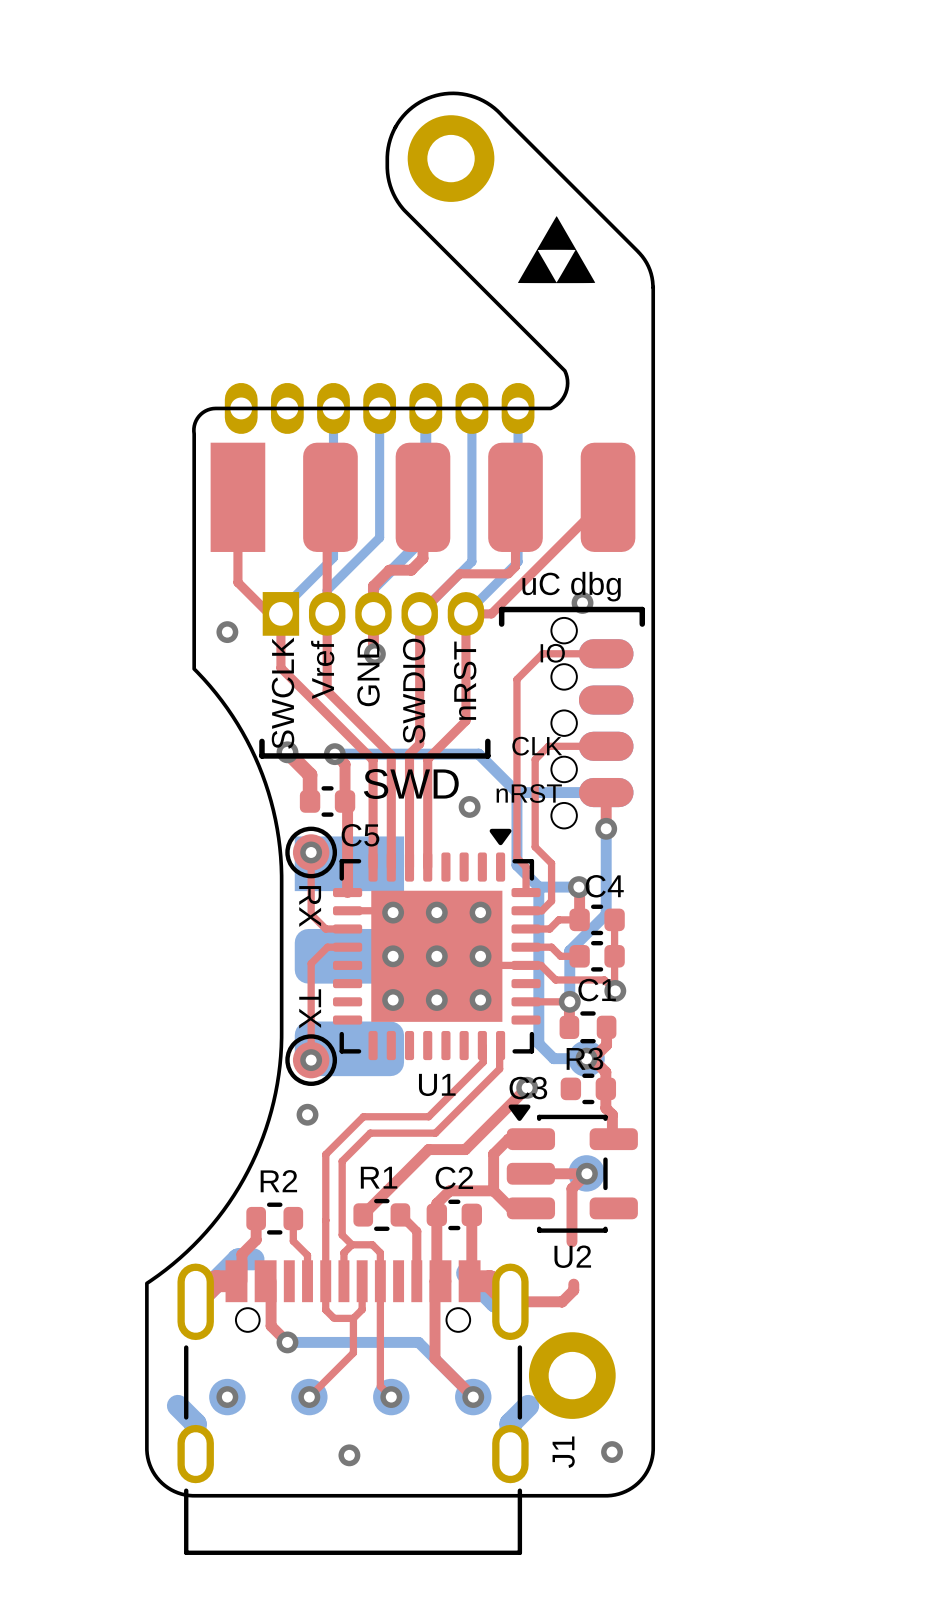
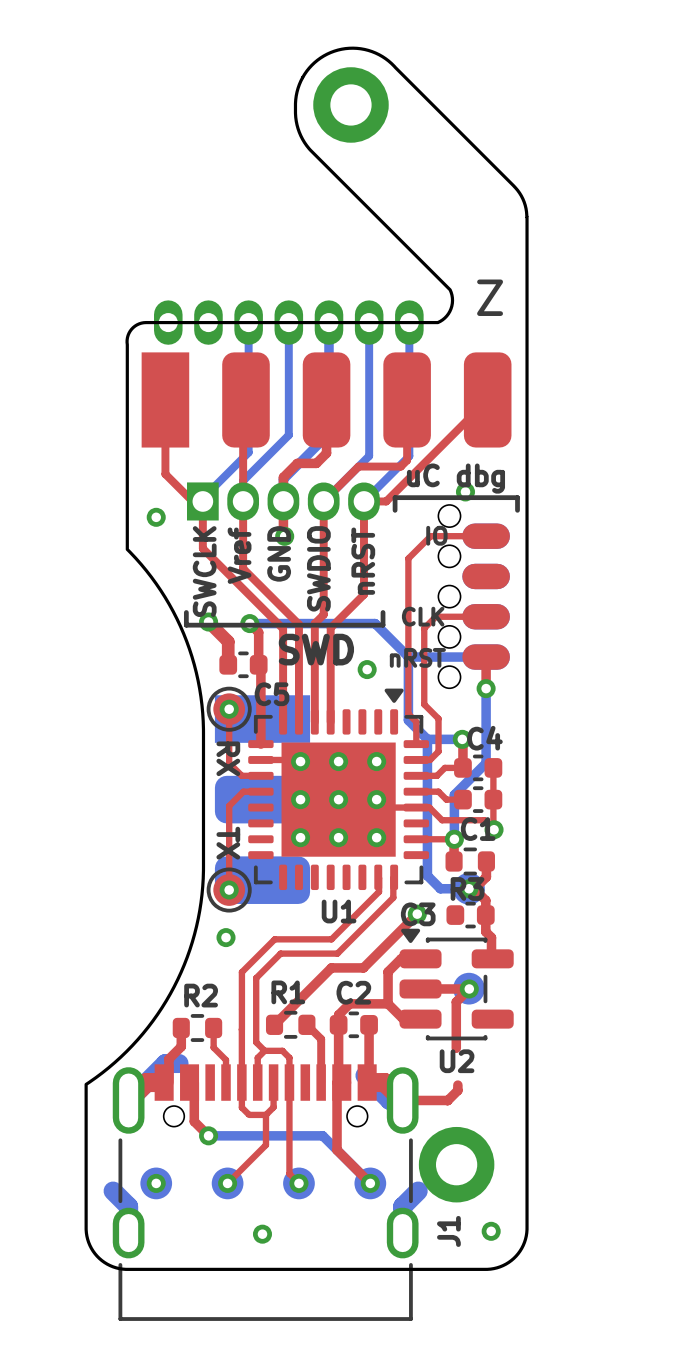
drawing: [517, 216, 596, 284] -> none
text: none -> Z (490, 297)

